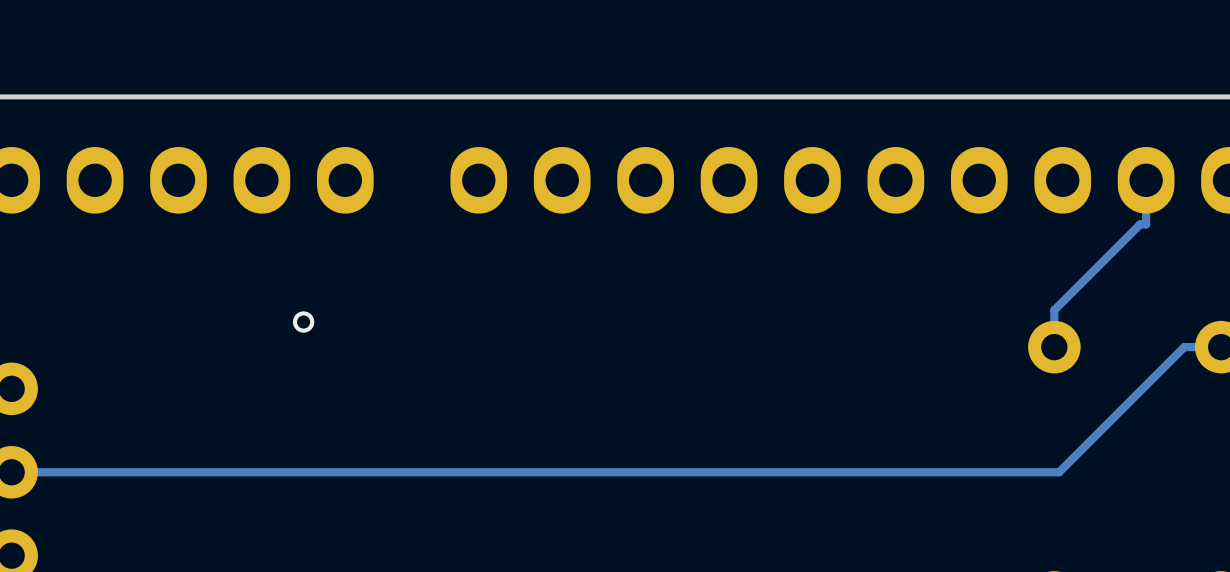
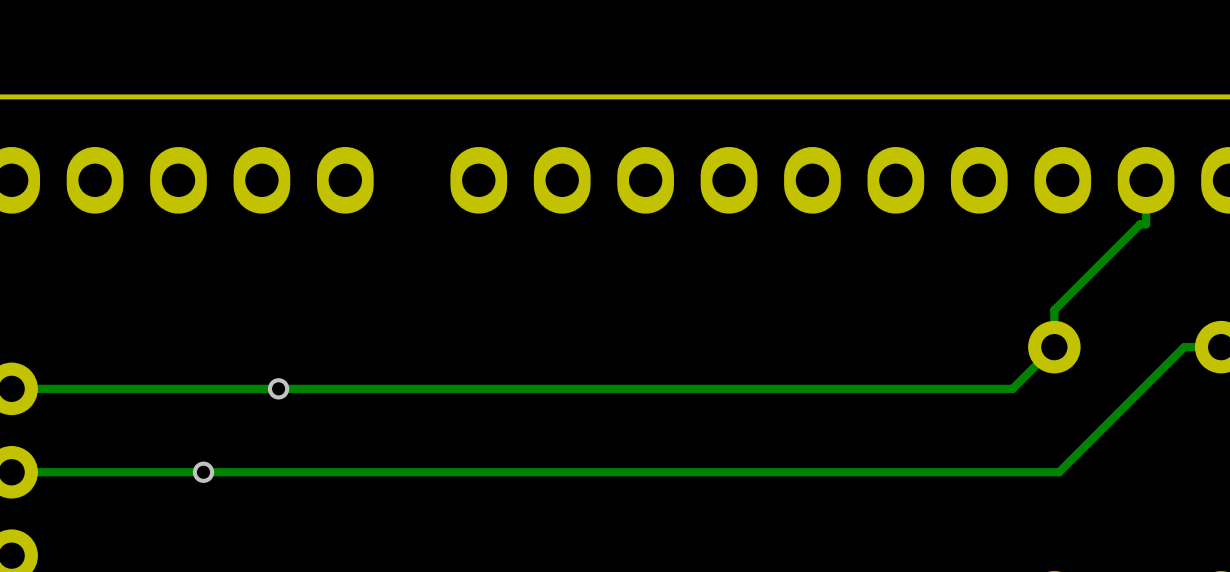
via position: (303, 322) -> (278, 388)
track: none -> (1054, 347) (1012, 388) (11, 388)
via: none -> (203, 472)

